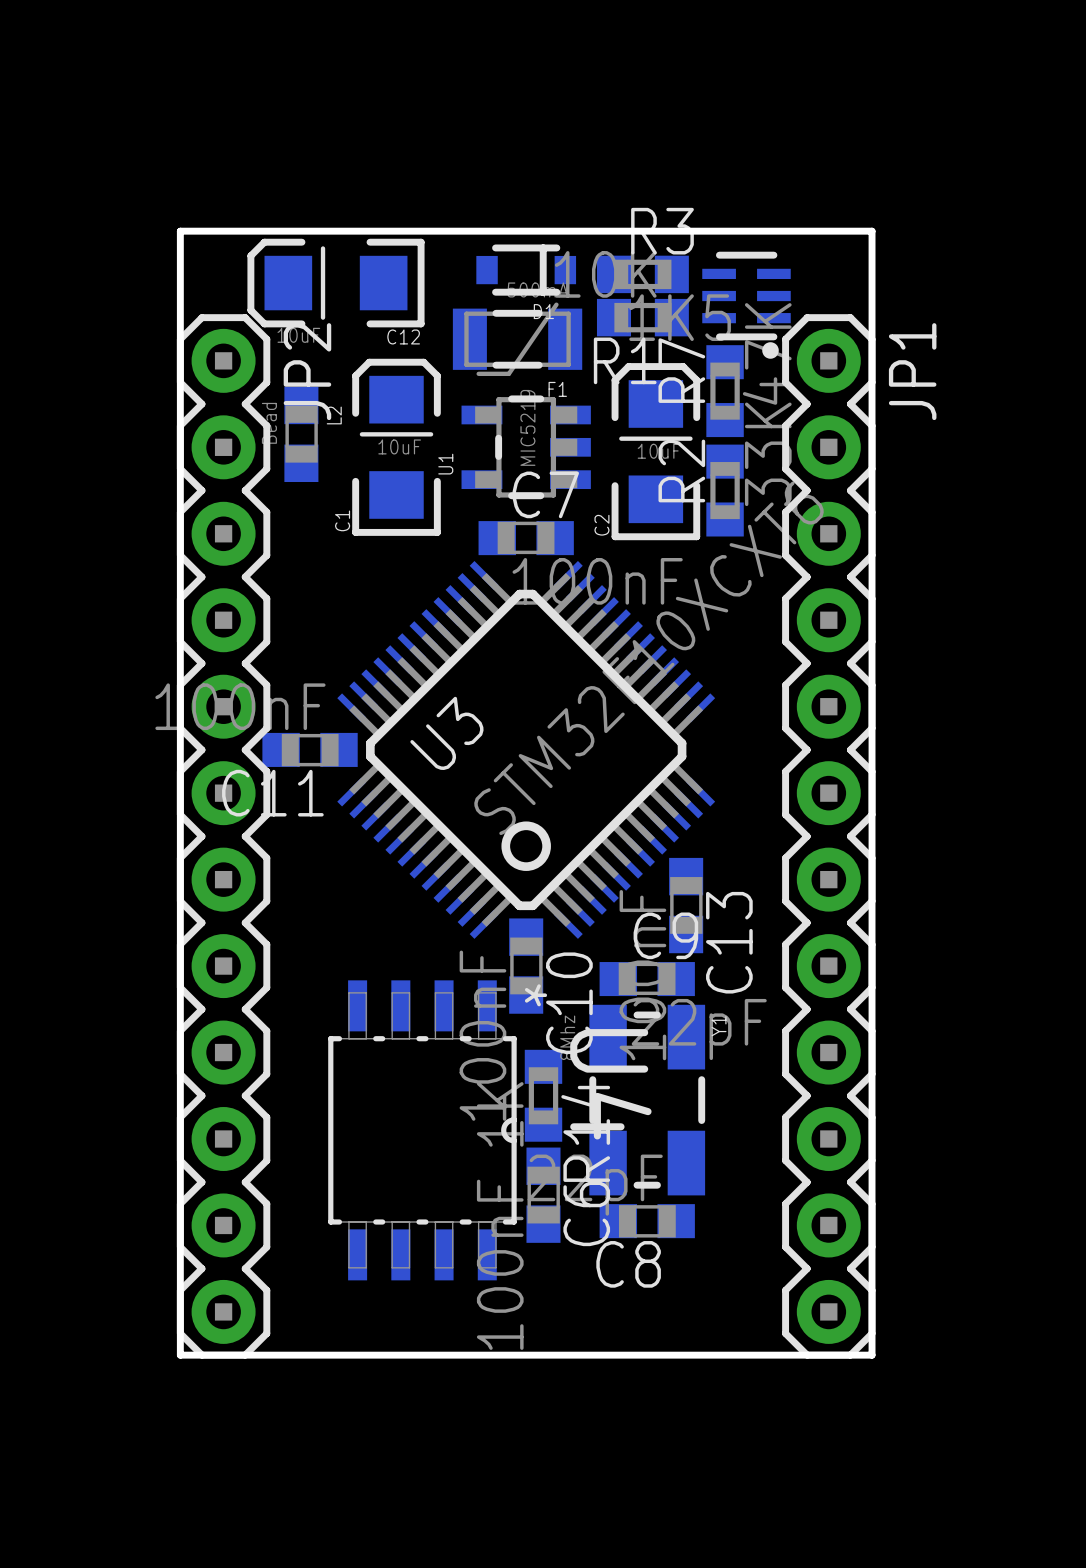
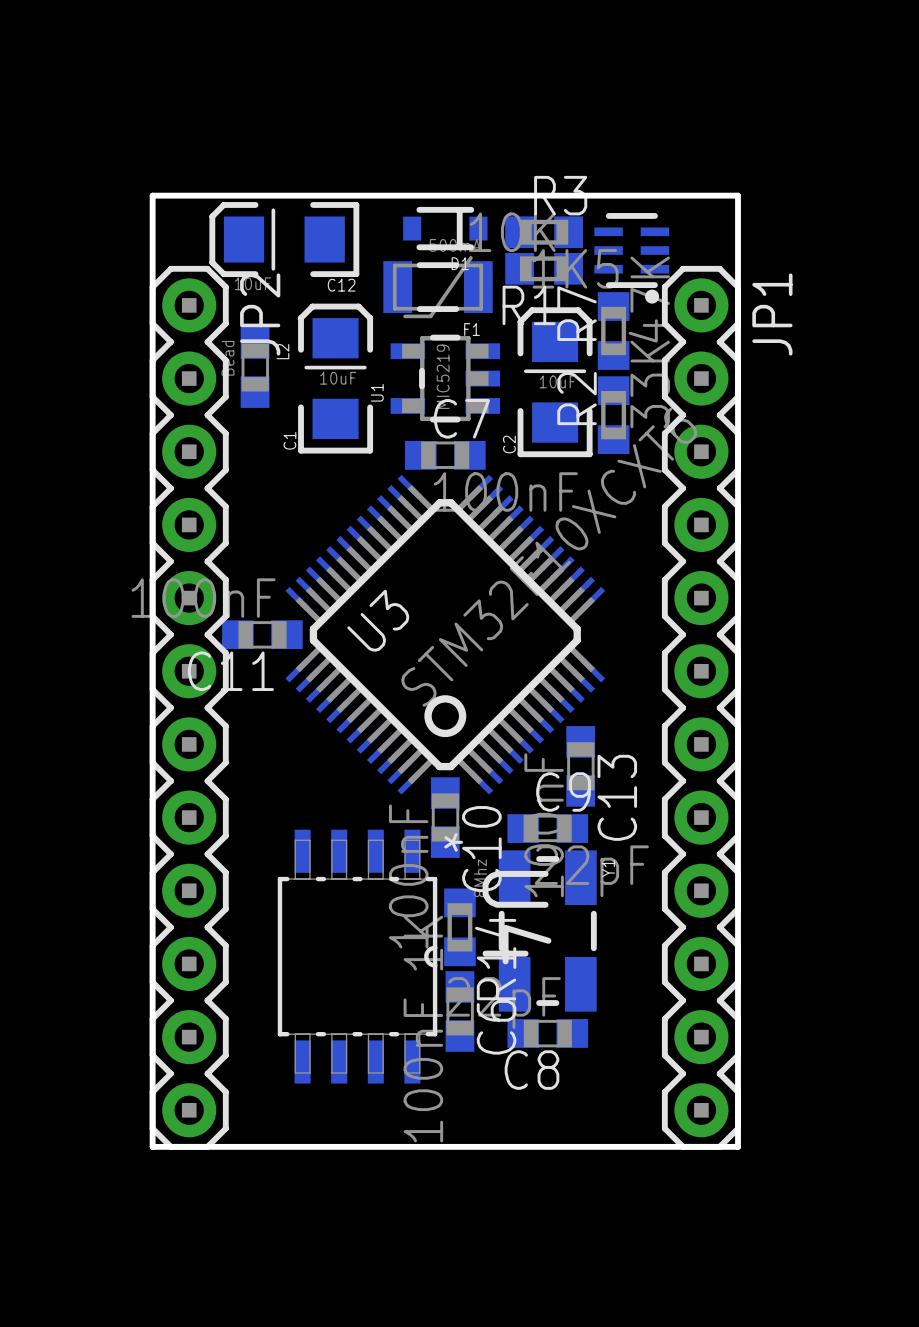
U1 value position: MIC5219 (527, 427) -> MIC5219 (443, 376)

